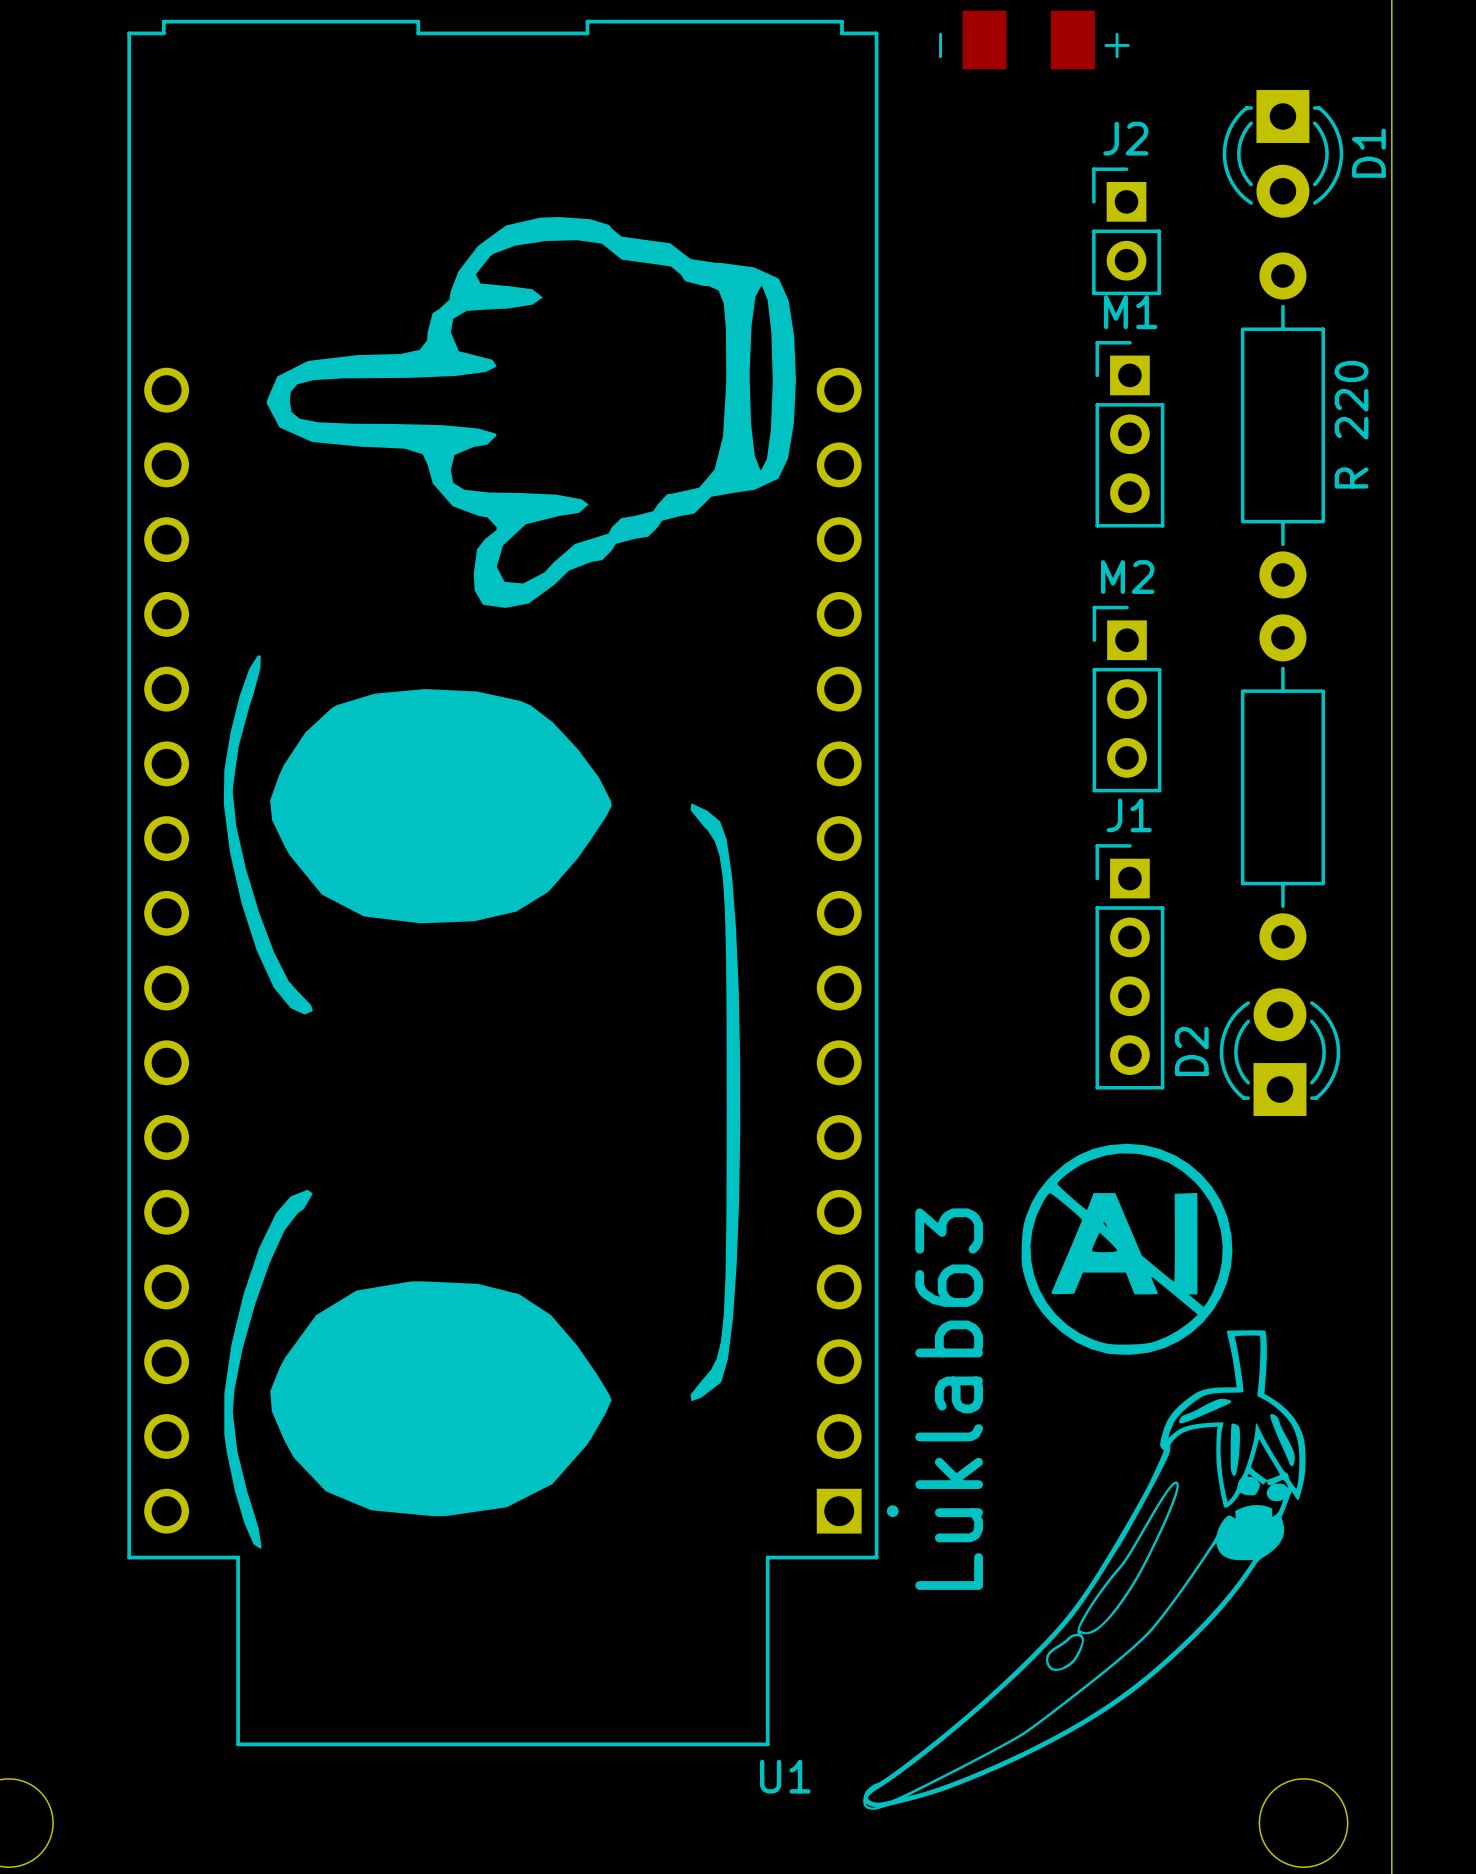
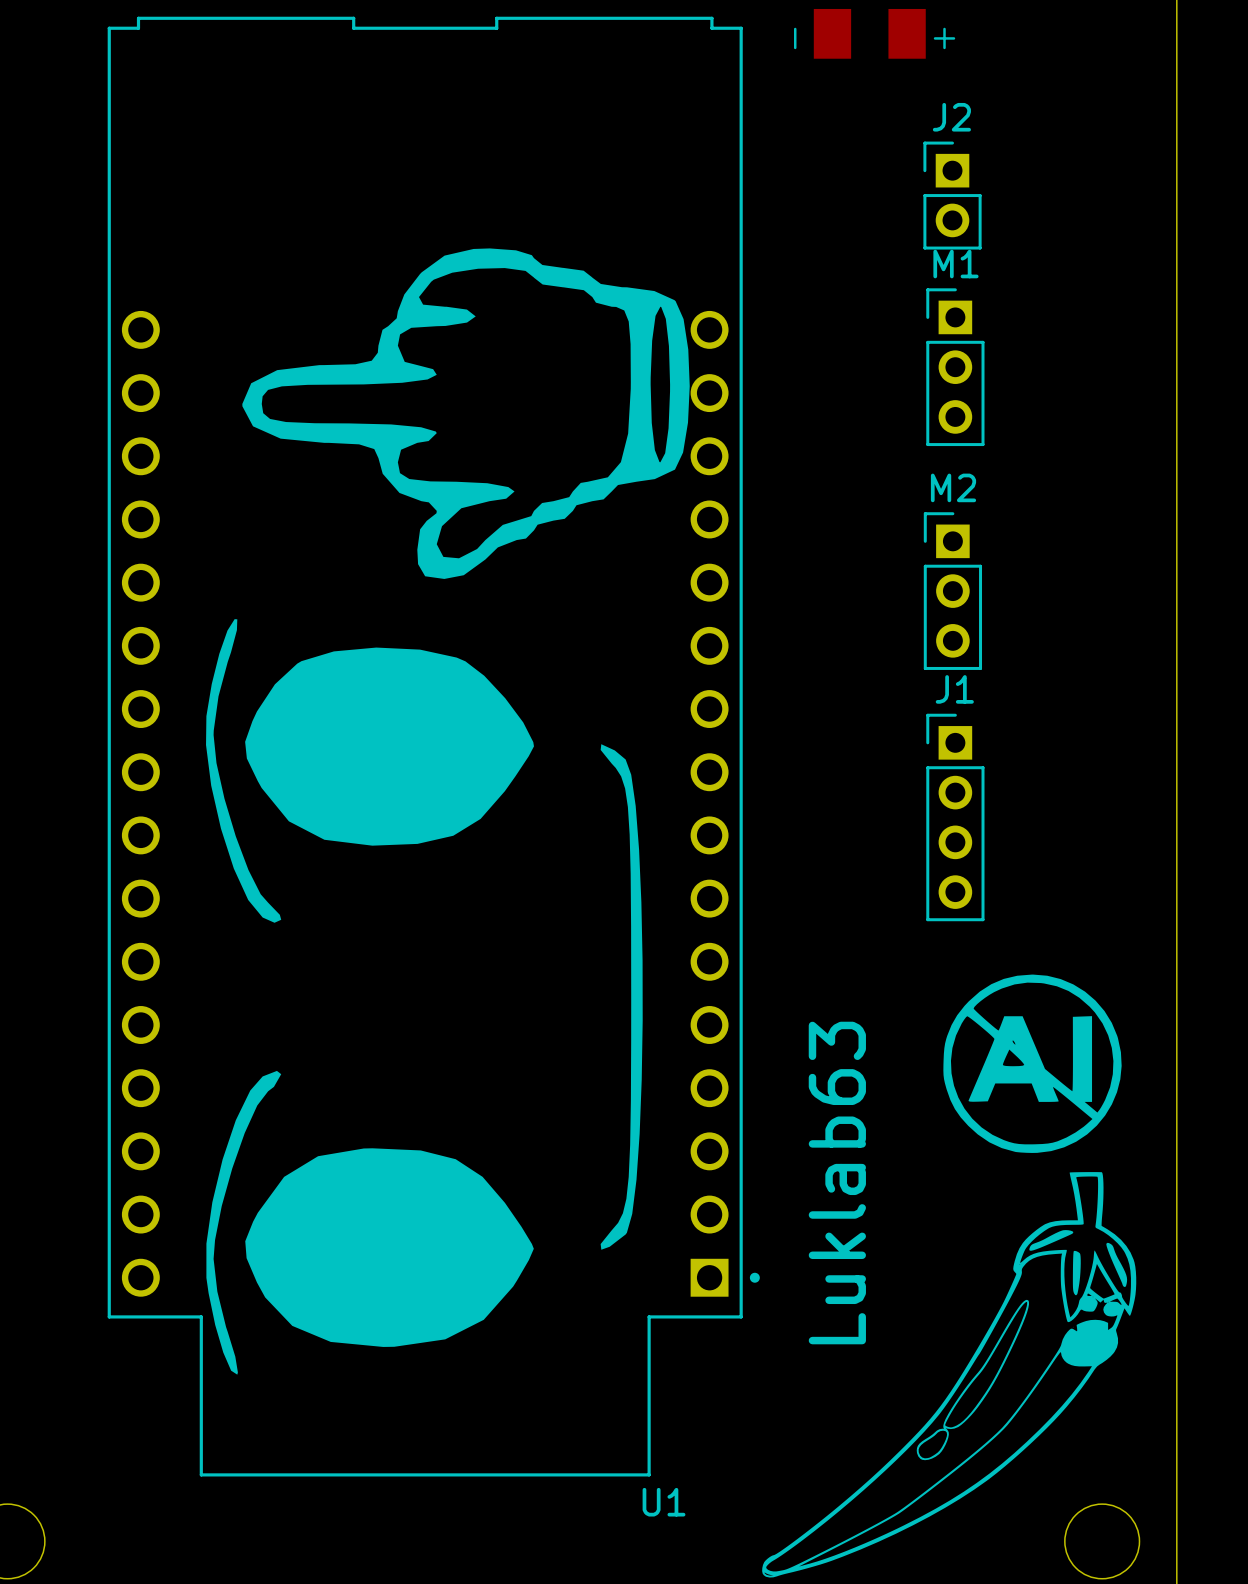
D1: (1282, 153) -> none
drawing: [223, 217, 796, 1550] -> none
drawing: none -> [206, 248, 690, 1375]
R 220: (1282, 425) -> none
part: (1282, 787) -> none
D2: (1280, 1052) -> none
drawing position: (1127, 1249) -> (1032, 1063)
text position: Luklab63 (949, 1399) -> Luklab63 (837, 1183)
drawing position: (1084, 1570) -> (949, 1374)

